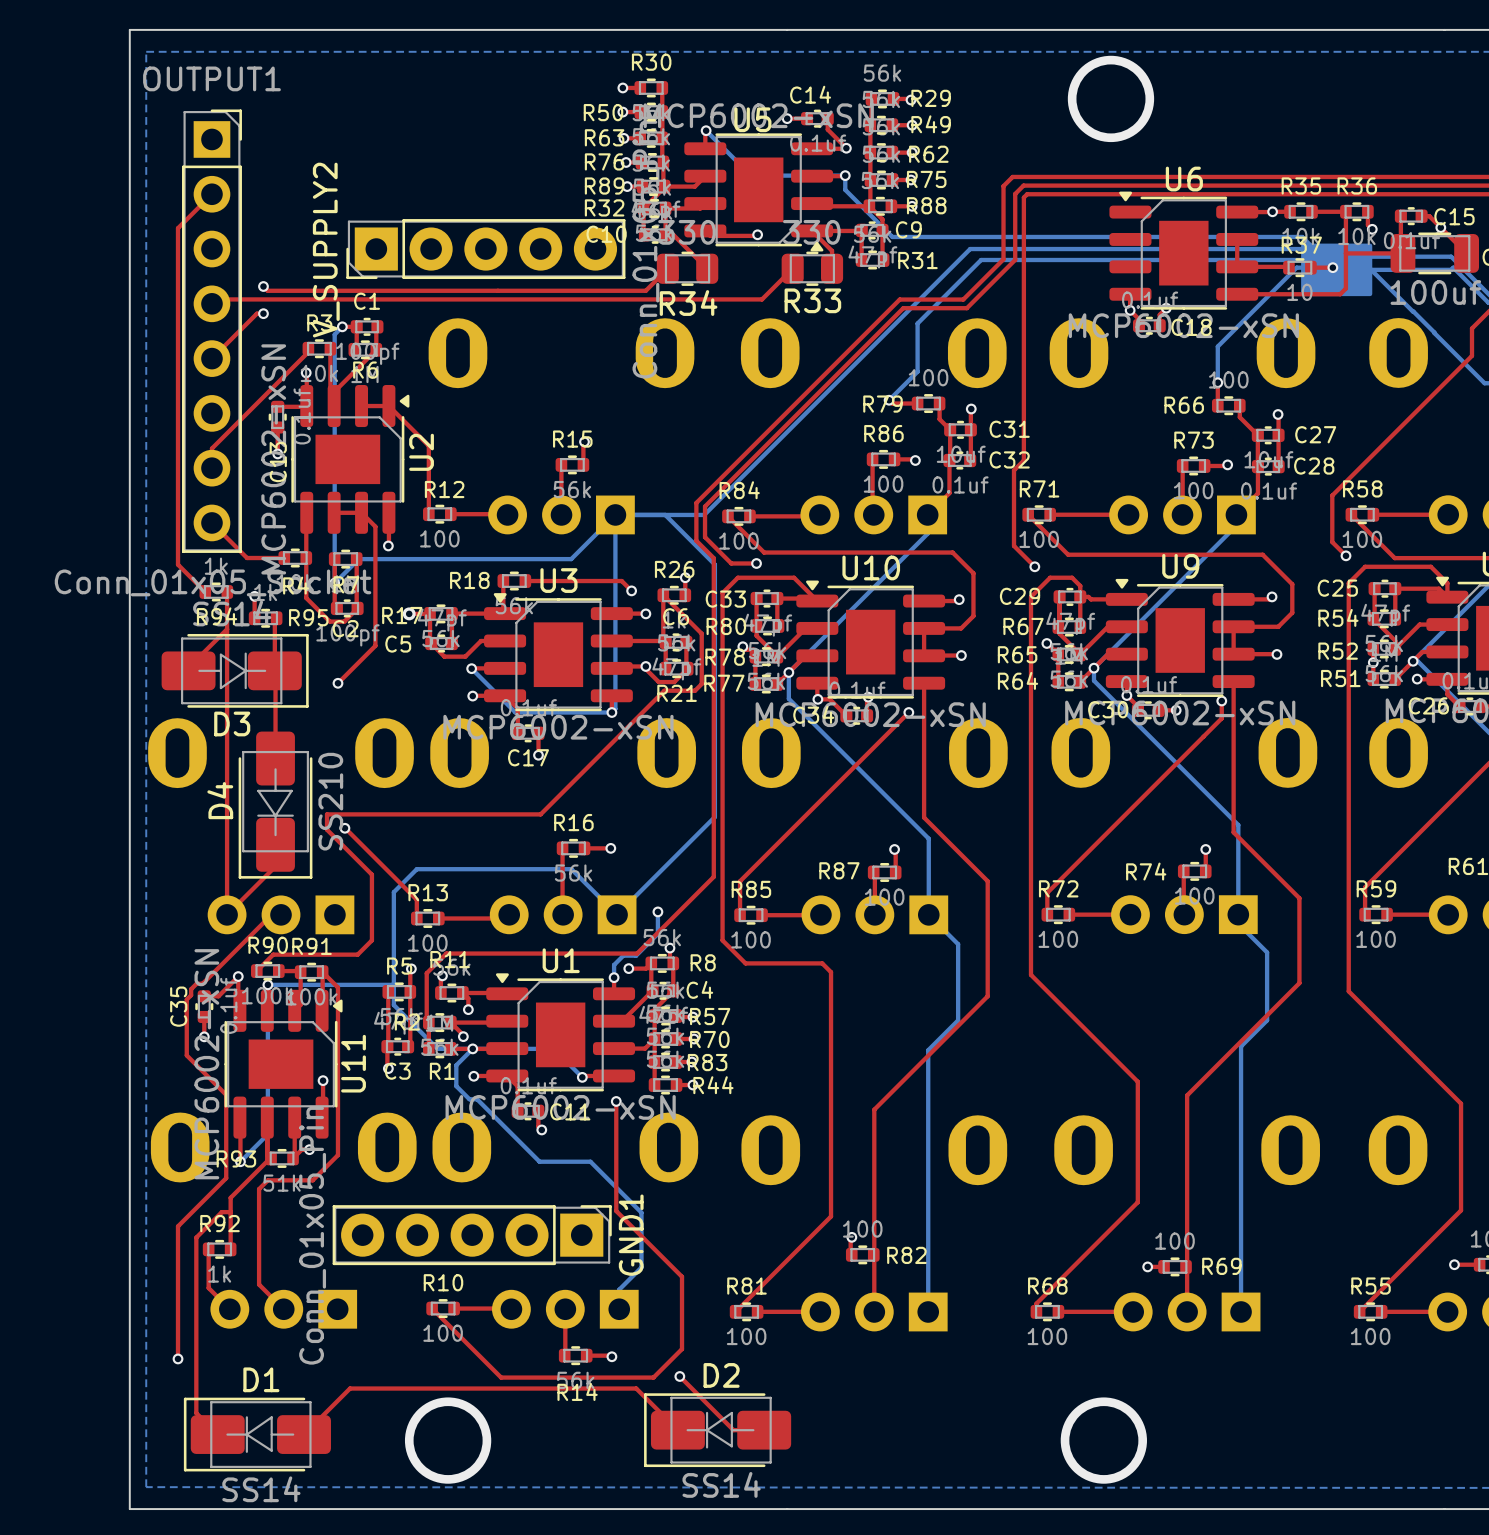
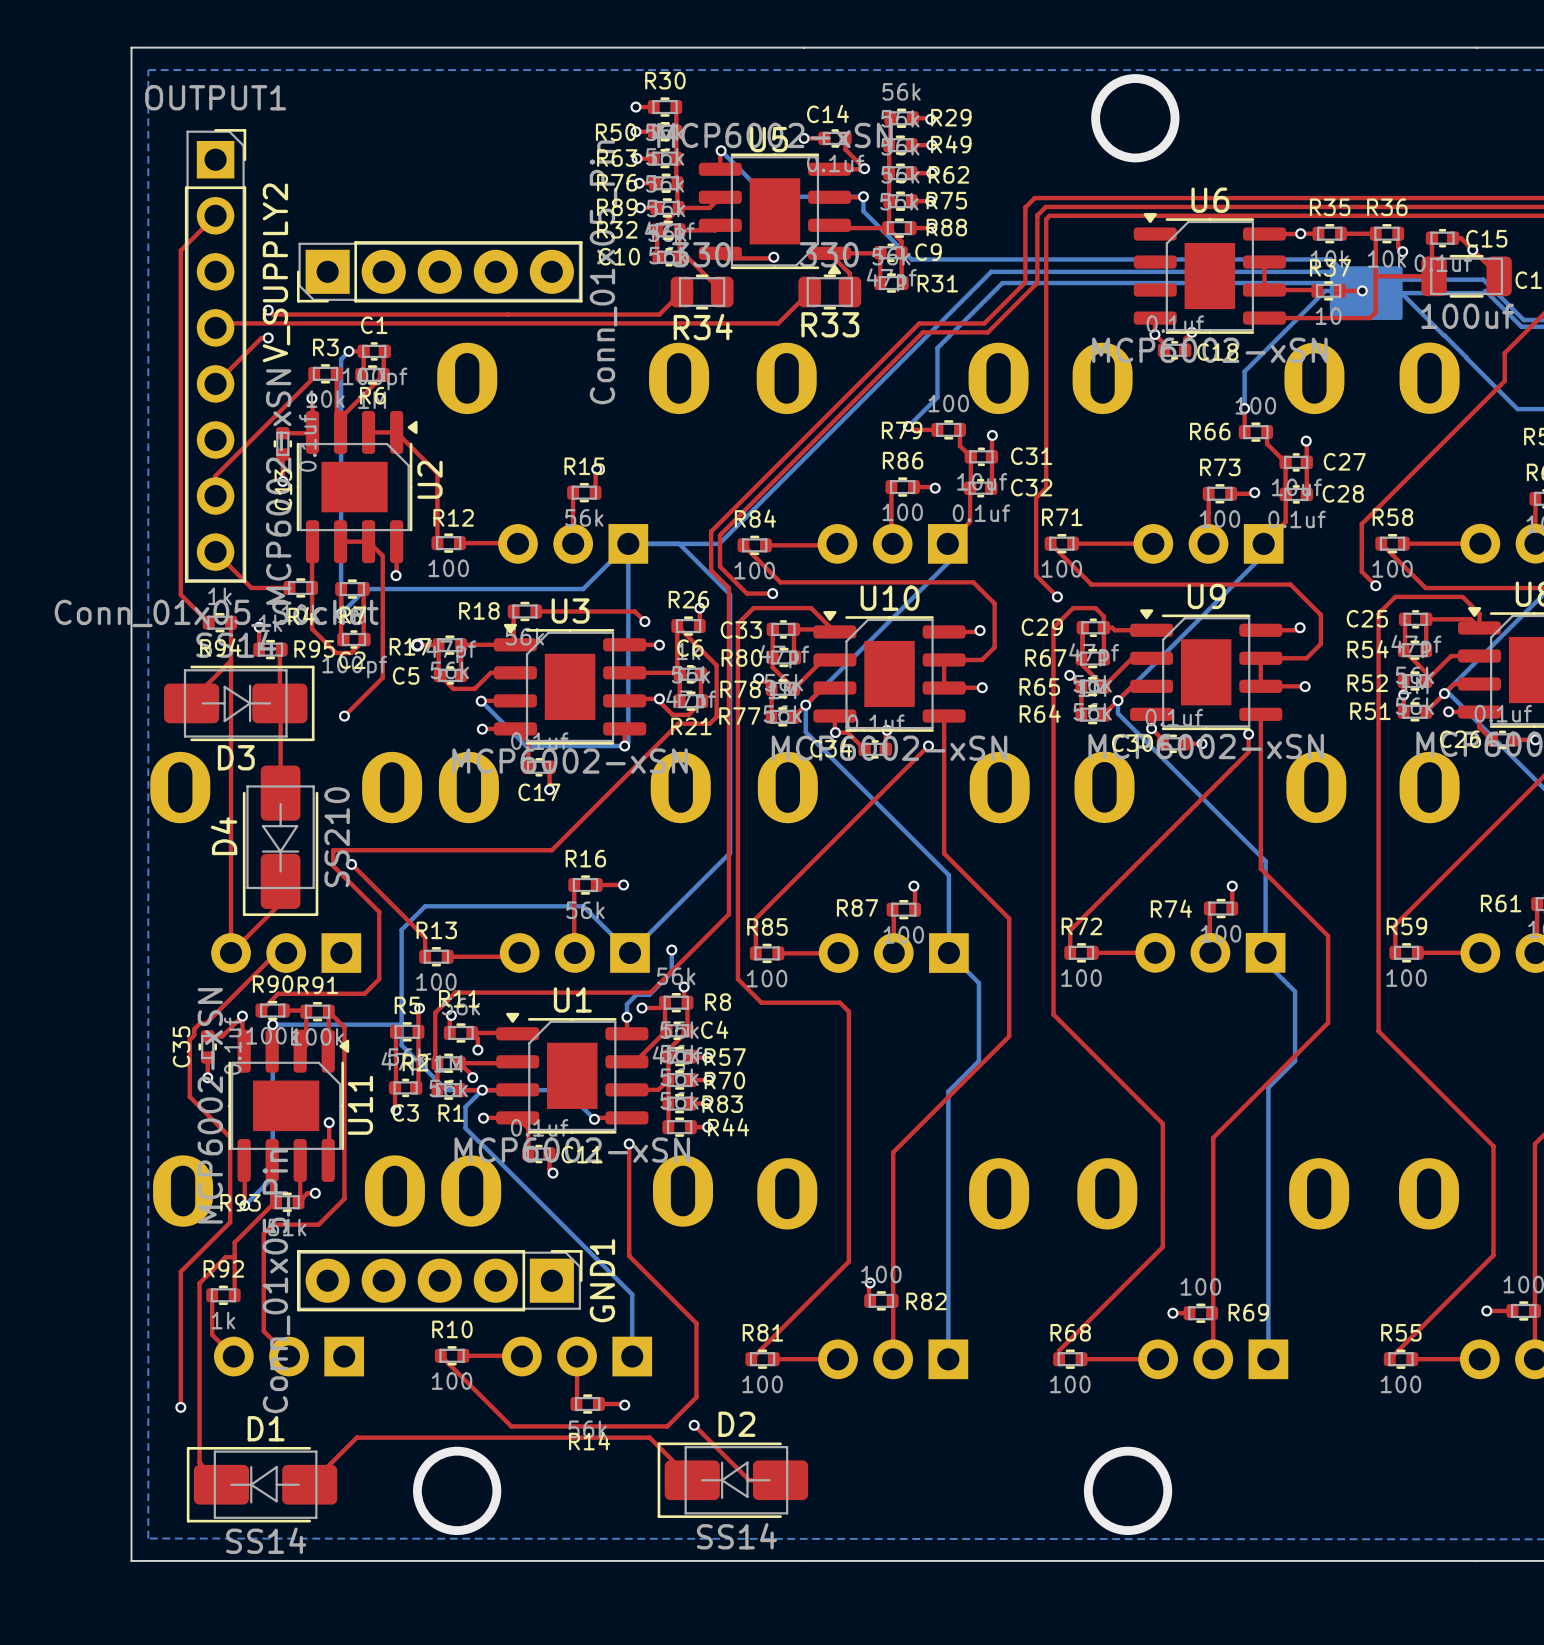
V_SUPPLY2 position: (485, 249) -> (439, 271)
bottom track: (469, 1099) (477, 1099) (539, 1161) (590, 1161) (641, 1212) (641, 1267) (619, 1289) -> (479, 1141) (632, 1294) (632, 1336)
GND1 position: (472, 1235) -> (439, 1280)

